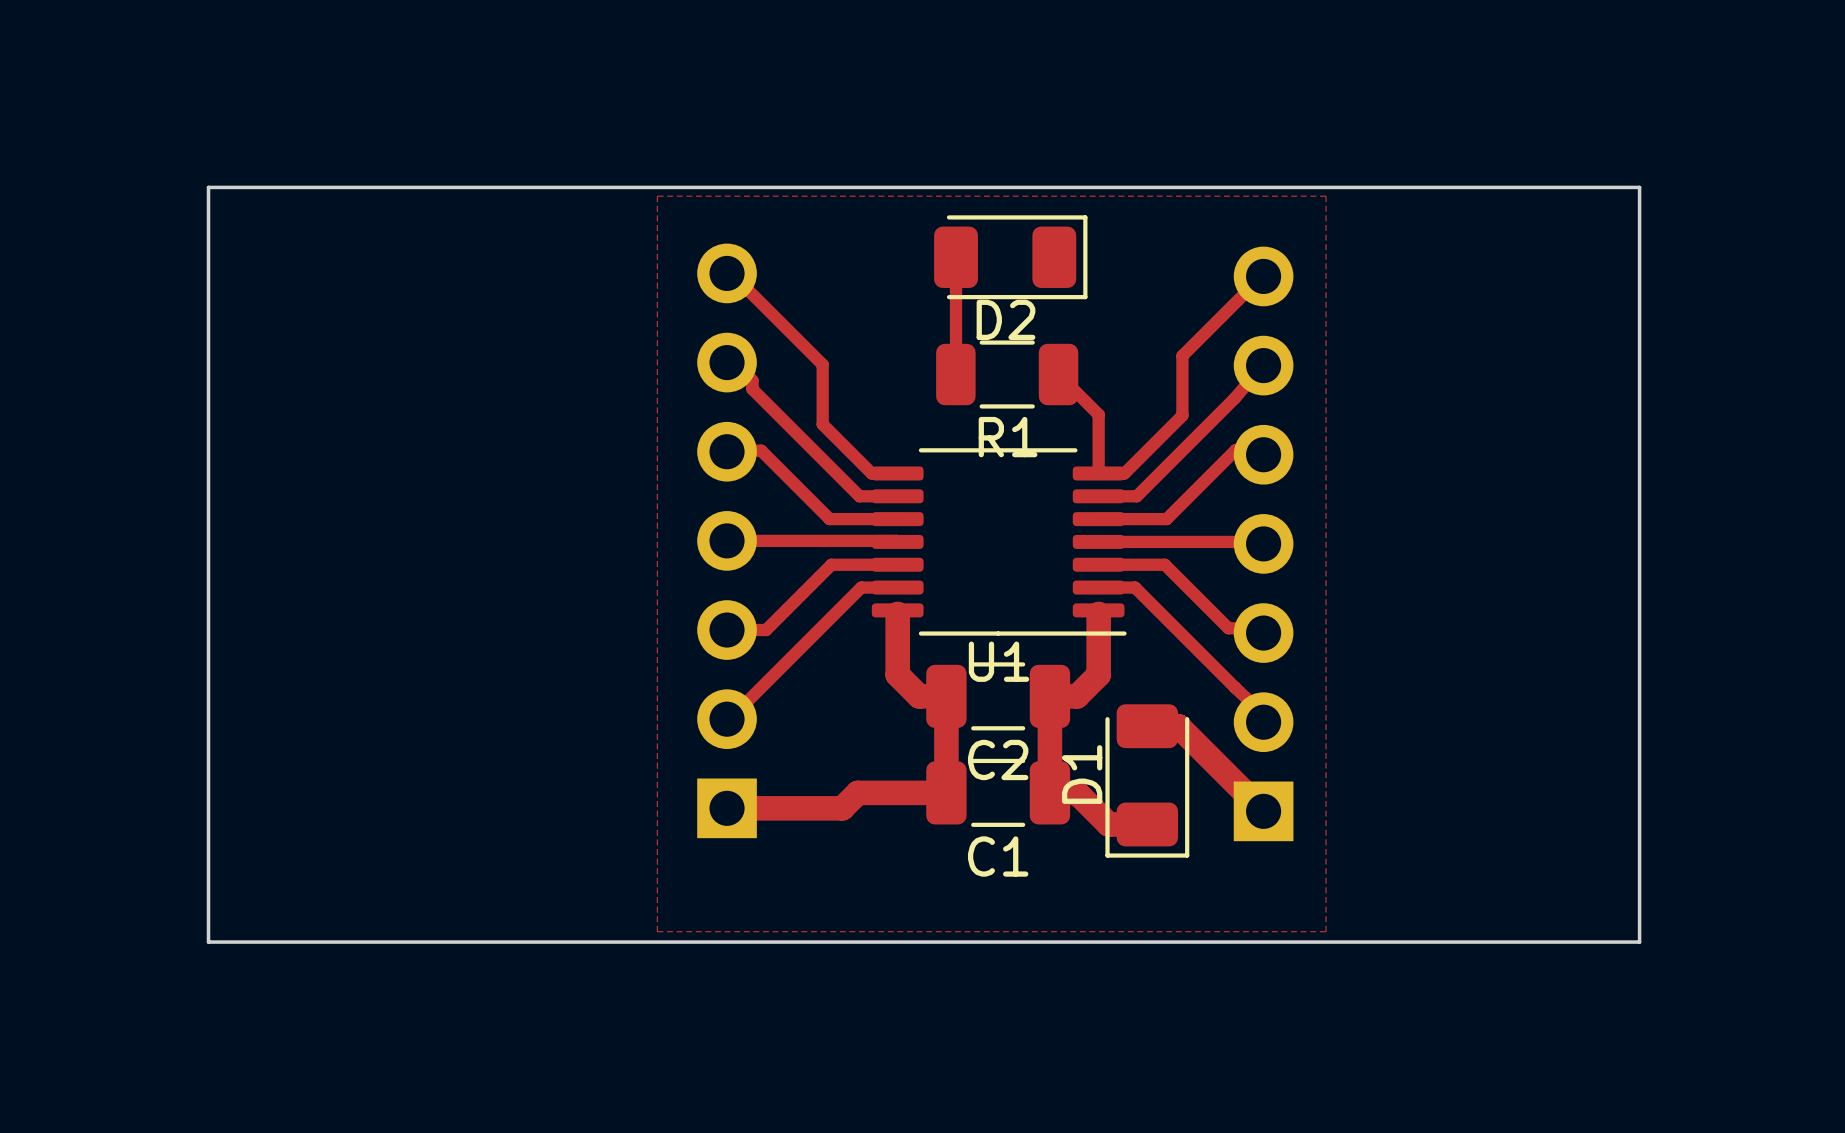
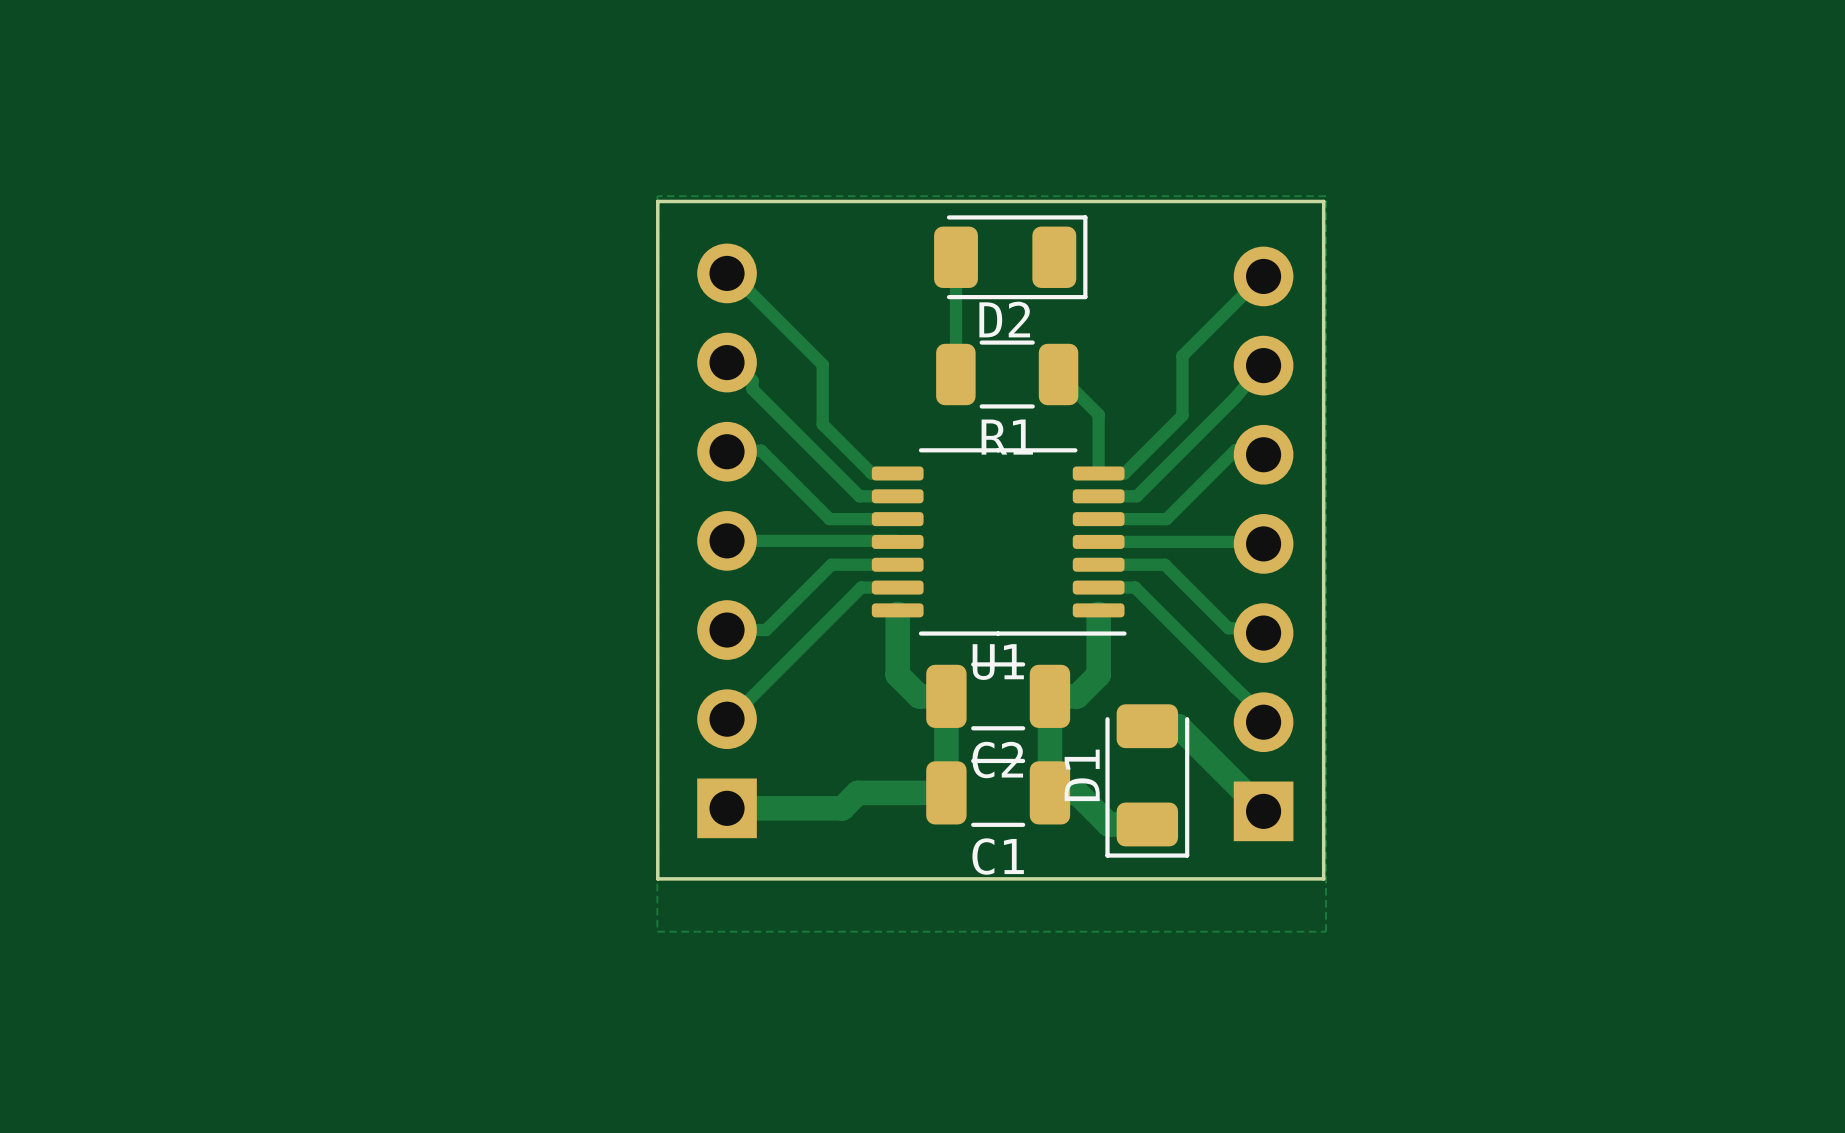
board edge: (208, 187) (1639, 187) (1639, 942) (208, 942) (208, 187) -> none
board edge: none -> (657, 201) (1323, 201) (1323, 878) (657, 878) (657, 201)

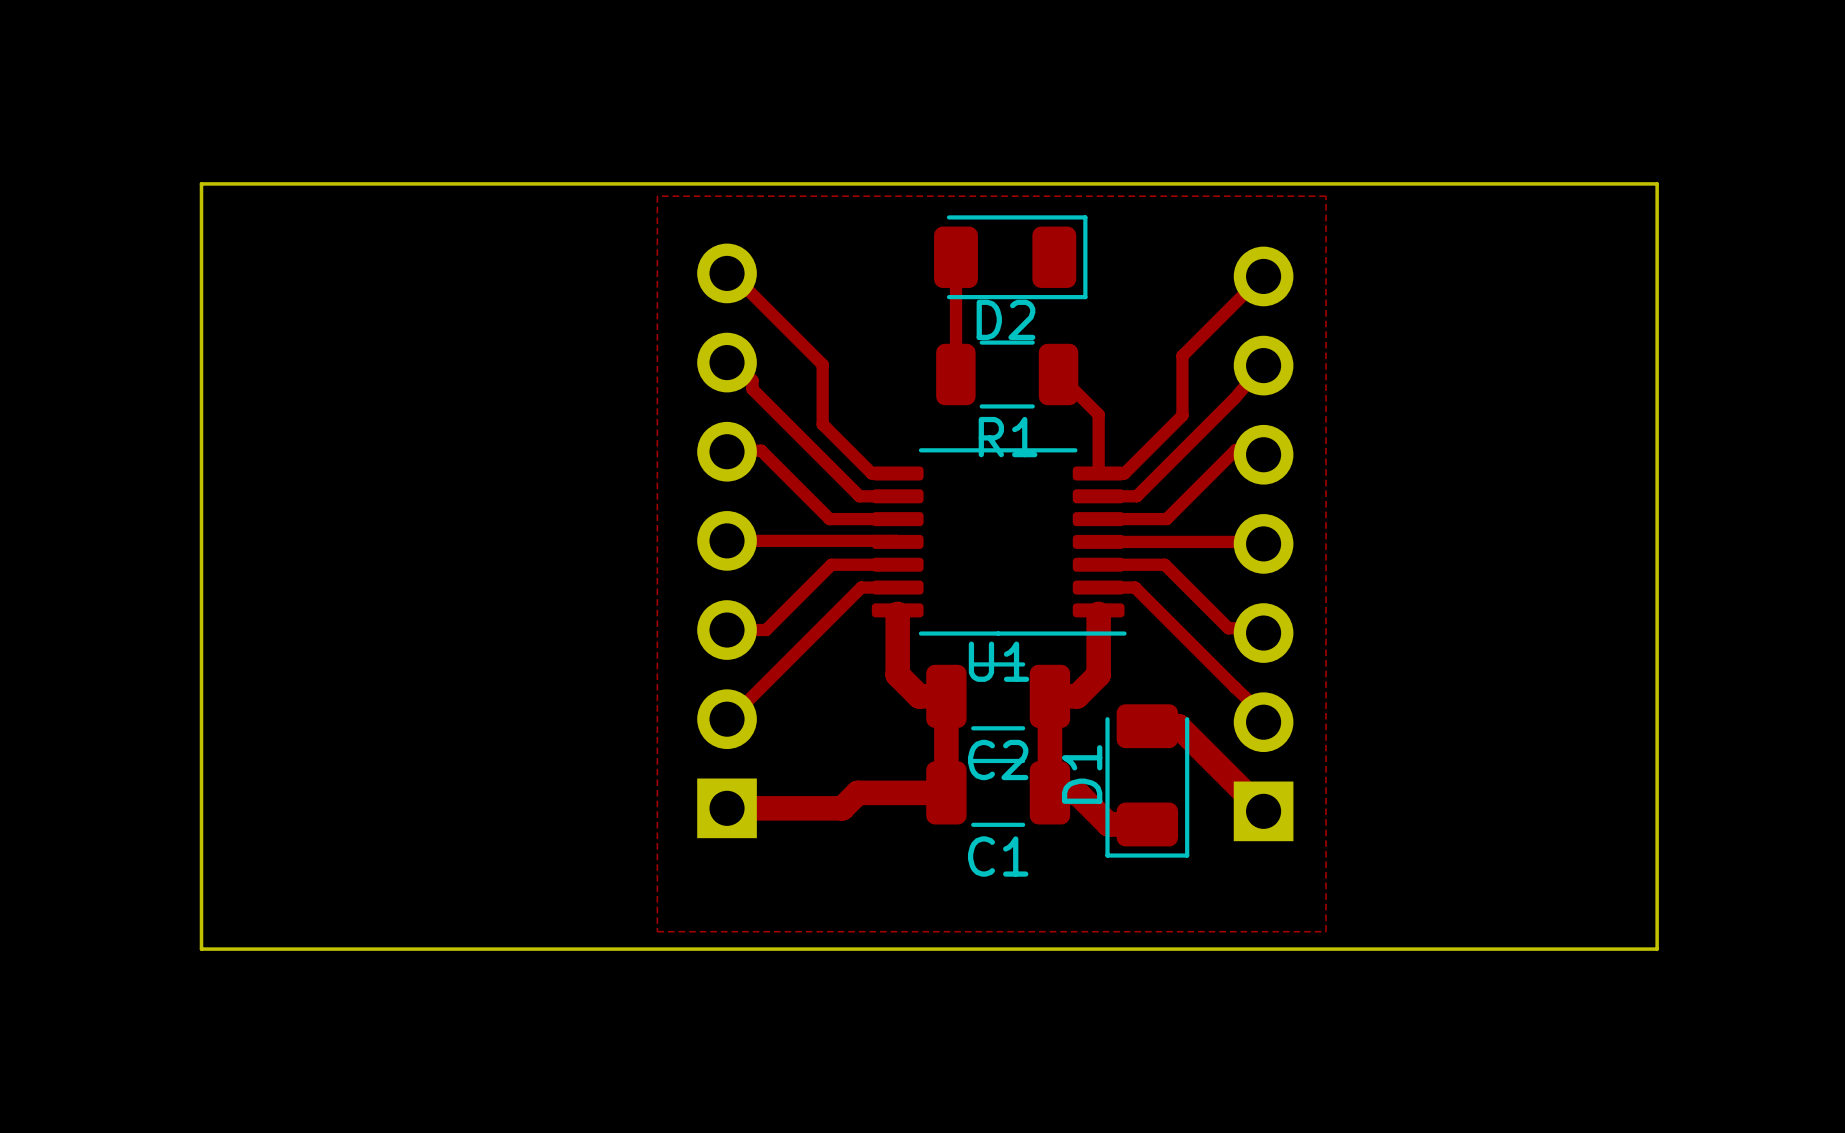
board edge: none -> (201, 183) (1657, 183) (1657, 949) (201, 949) (201, 183)
board edge: (657, 201) (1323, 201) (1323, 878) (657, 878) (657, 201) -> none

